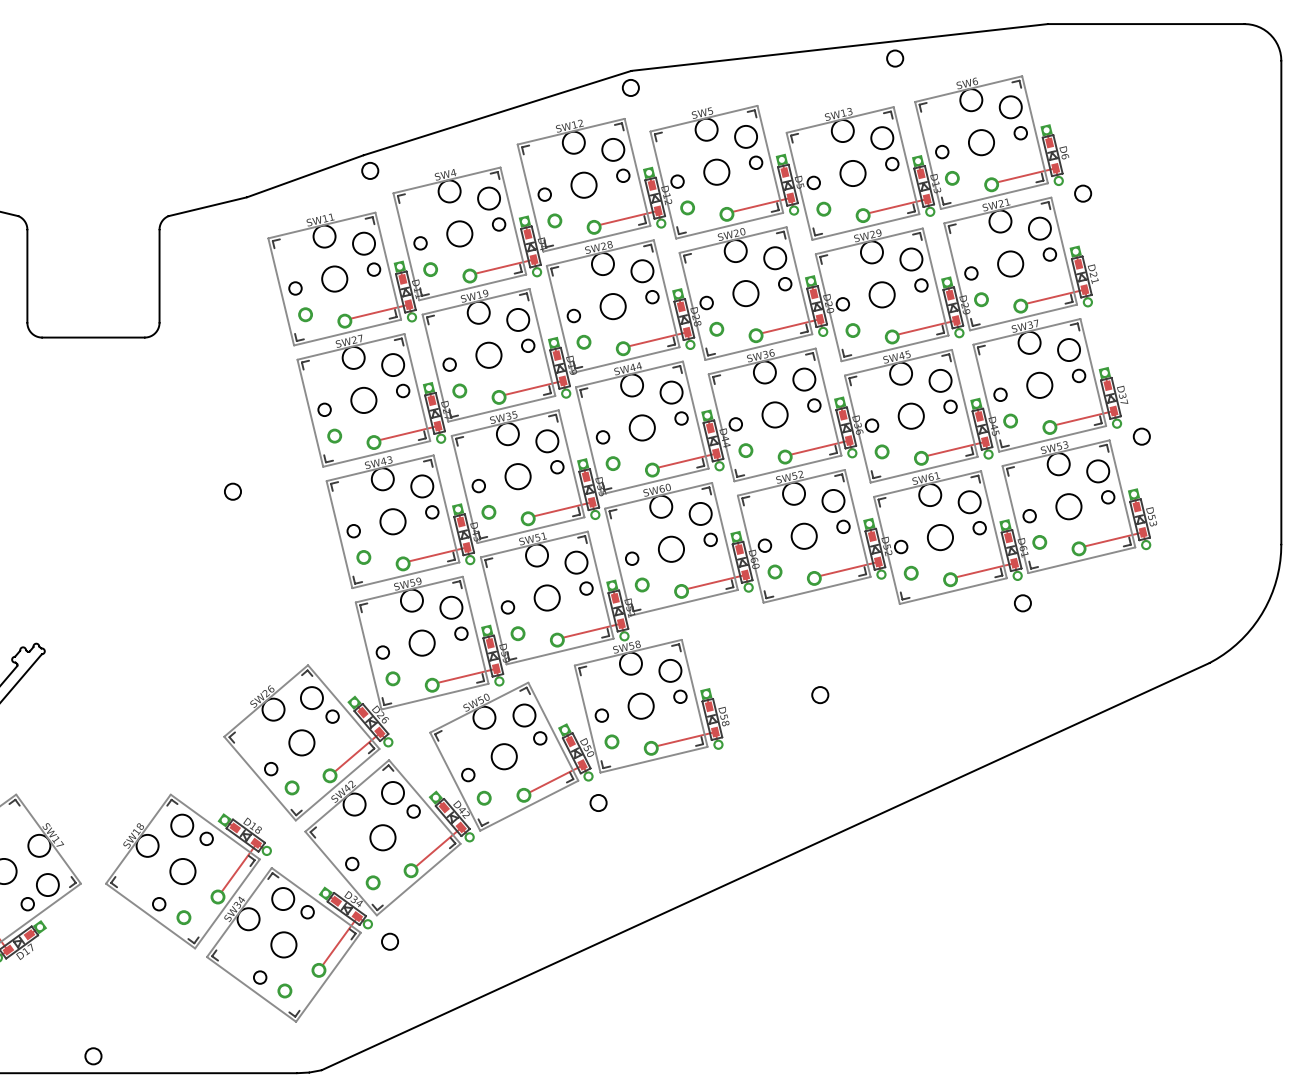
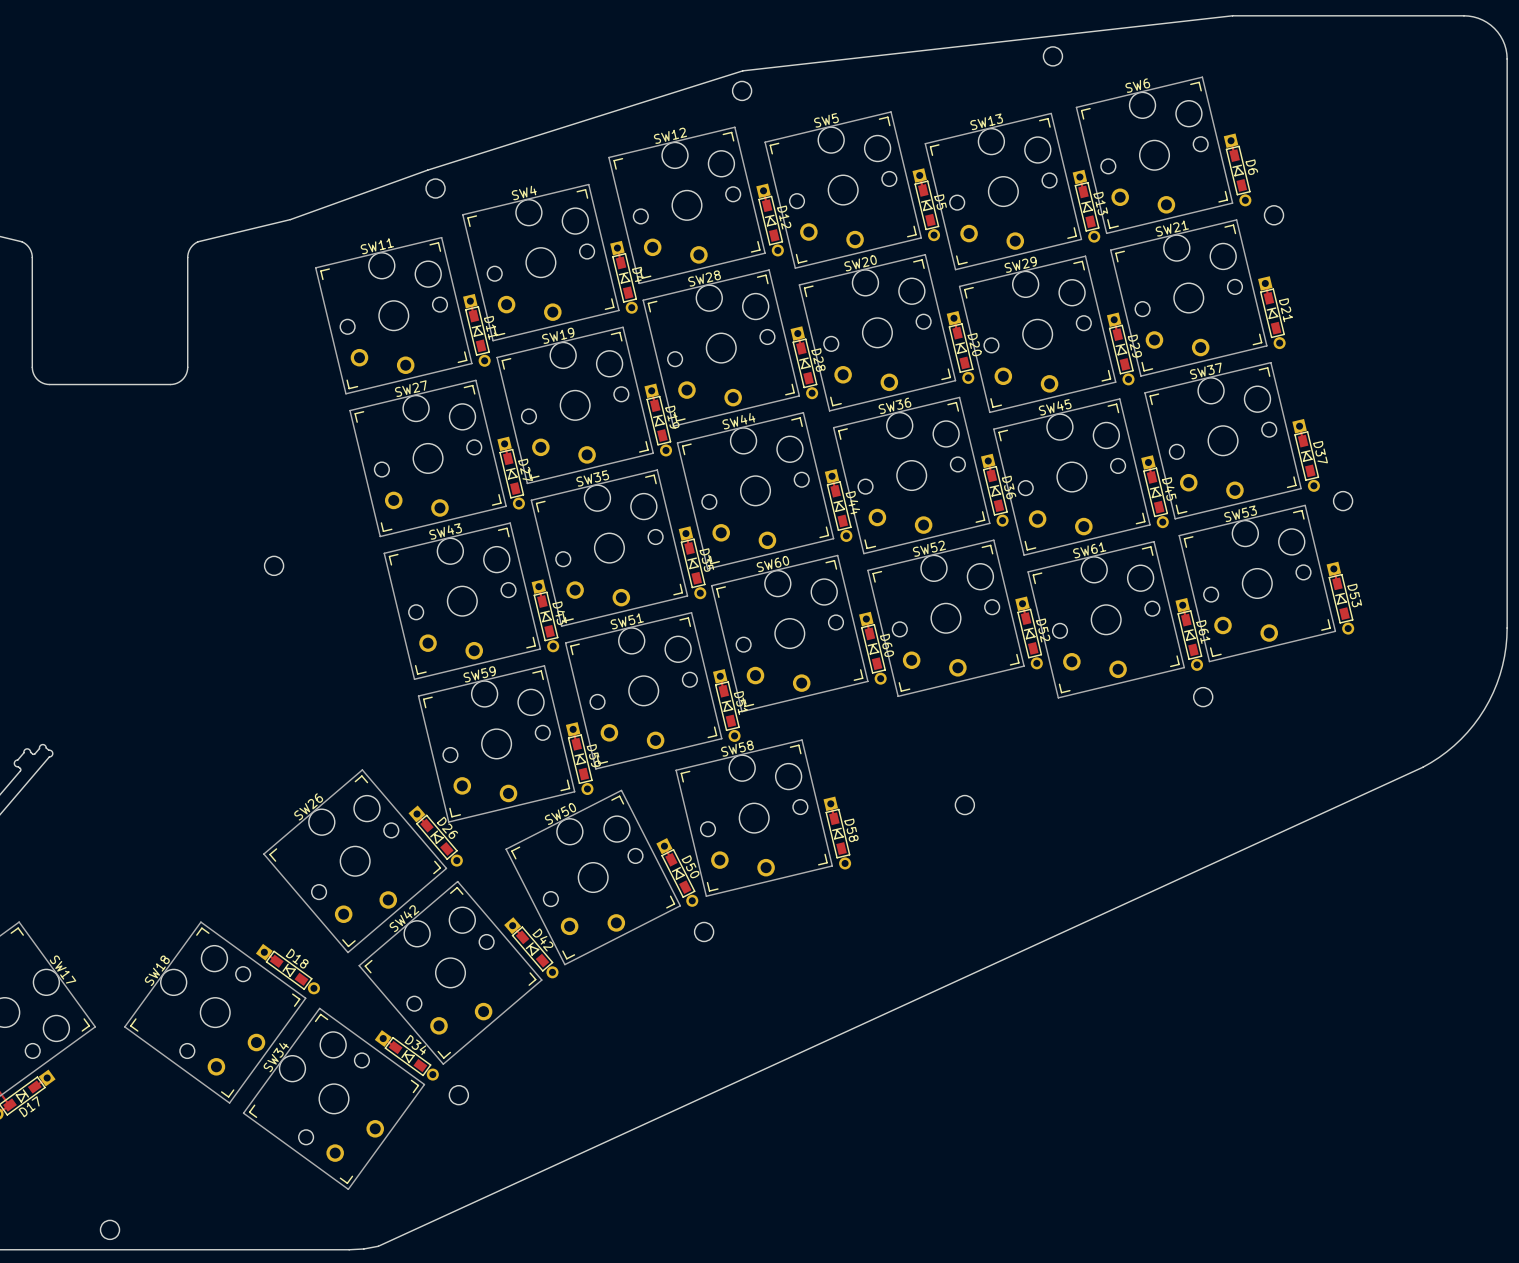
track: (1058, 180) (1055, 168) (991, 184) -> none
track: (794, 210) (791, 197) (726, 214) -> none
track: (930, 211) (927, 199) (863, 215) -> none
track: (661, 223) (658, 210) (594, 227) -> none
track: (537, 272) (534, 259) (469, 276) -> none
track: (1087, 302) (1084, 289) (1020, 306) -> none
track: (411, 317) (408, 304) (344, 321) -> none
track: (823, 331) (820, 319) (756, 335) -> none
track: (959, 333) (956, 320) (892, 336) -> none
track: (690, 344) (687, 332) (623, 348) -> none
track: (566, 393) (563, 380) (499, 397) -> none
track: (1117, 423) (1113, 411) (1049, 427) -> none
track: (441, 438) (438, 426) (374, 442) -> none
track: (852, 453) (849, 440) (785, 457) -> none
track: (988, 454) (985, 441) (921, 458) -> none
track: (719, 466) (716, 453) (652, 470) -> none
track: (595, 514) (592, 502) (528, 518) -> none
track: (1146, 545) (1143, 532) (1079, 548) -> none
track: (470, 560) (467, 547) (403, 563) -> none
track: (881, 574) (878, 561) (814, 578) -> none
track: (1017, 575) (1014, 563) (950, 579) -> none
track: (748, 587) (745, 574) (681, 591) -> none
track: (624, 636) (621, 623) (557, 640) -> none
track: (499, 681) (496, 668) (432, 685) -> none
track: (388, 742) (379, 732) (330, 775) -> none
track: (718, 744) (715, 732) (651, 748) -> none
track: (588, 776) (582, 764) (523, 795) -> none
track: (469, 837) (461, 827) (411, 870) -> none
track: (266, 850) (256, 843) (217, 897) -> none
track: (367, 924) (357, 916) (318, 970) -> none

